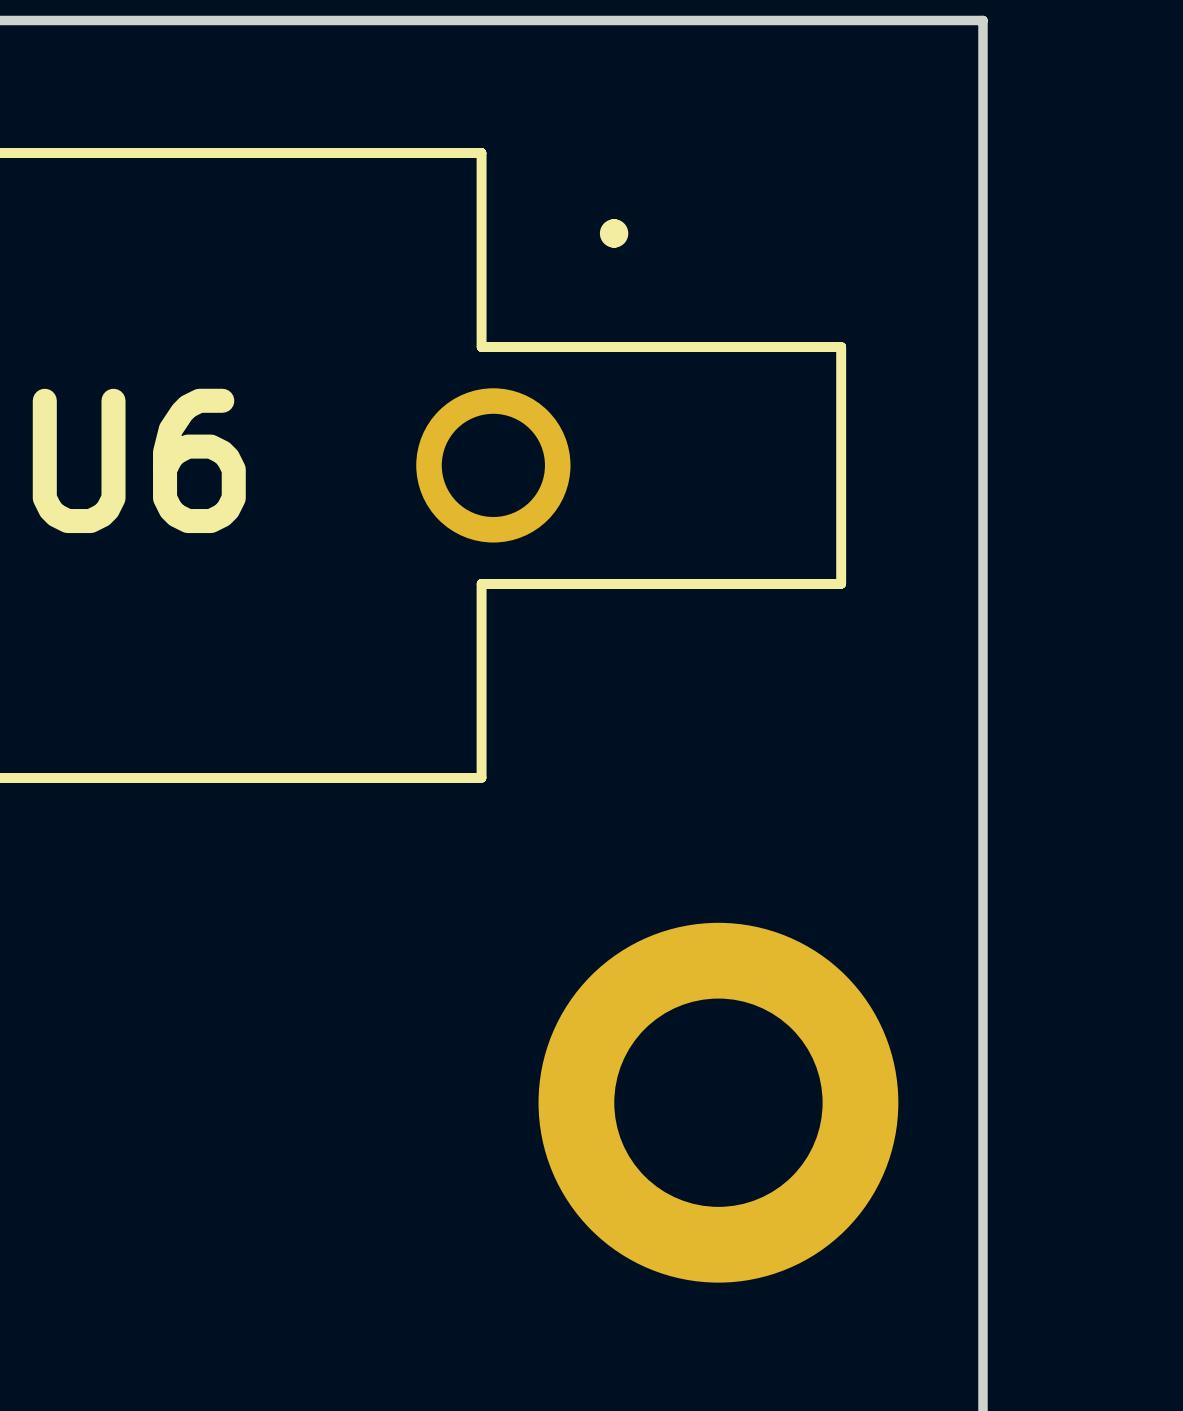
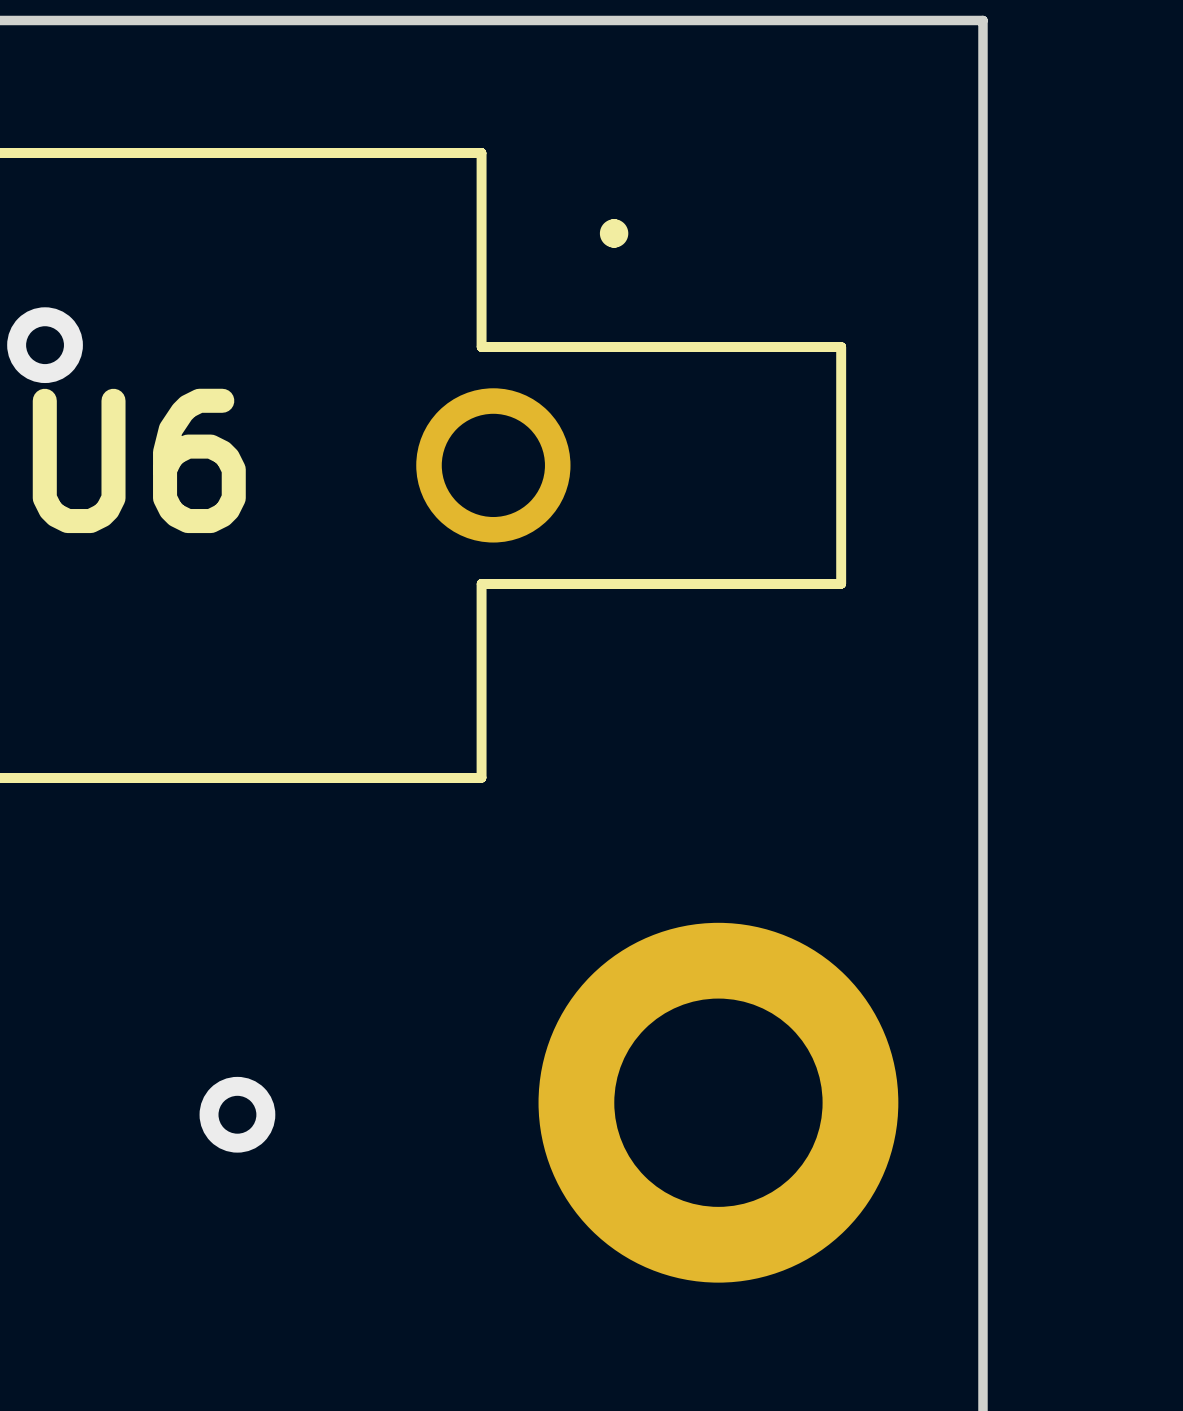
via: none -> (45, 345)
via: none -> (237, 1114)

